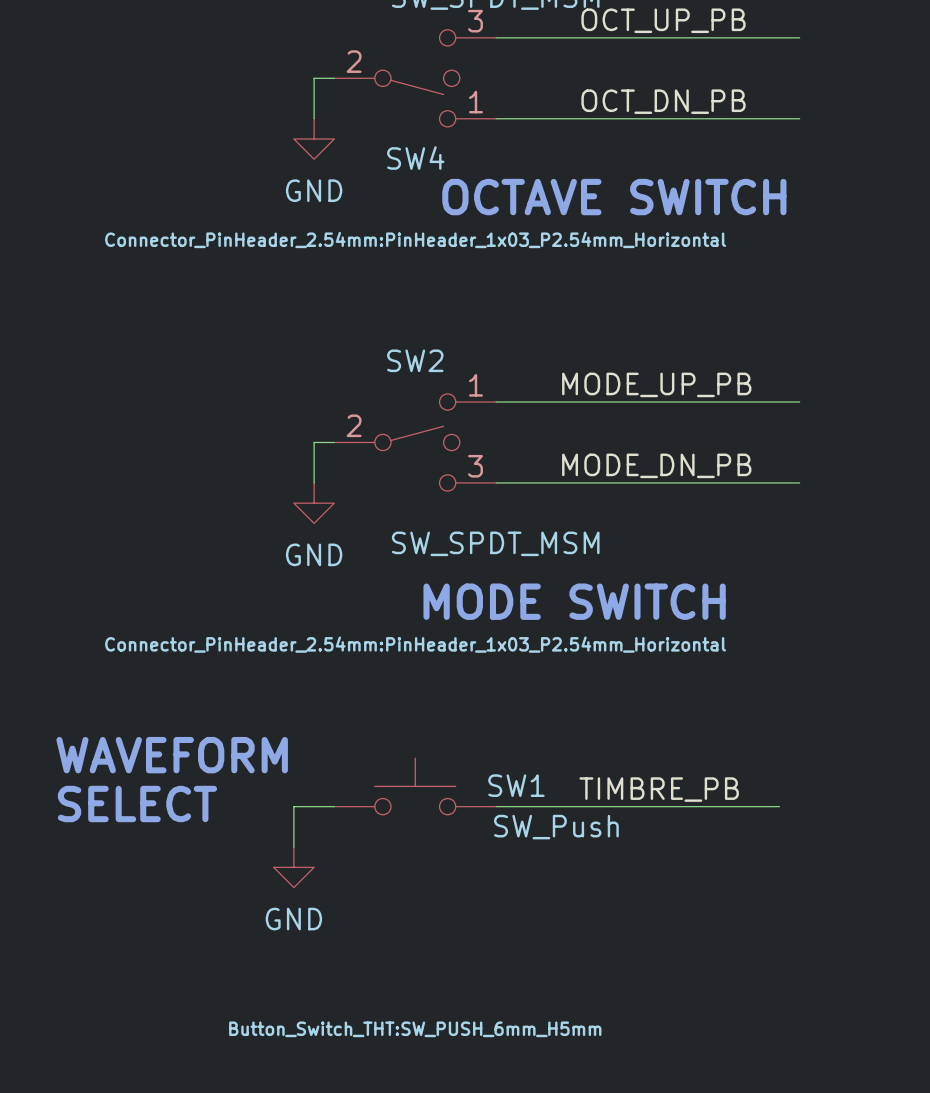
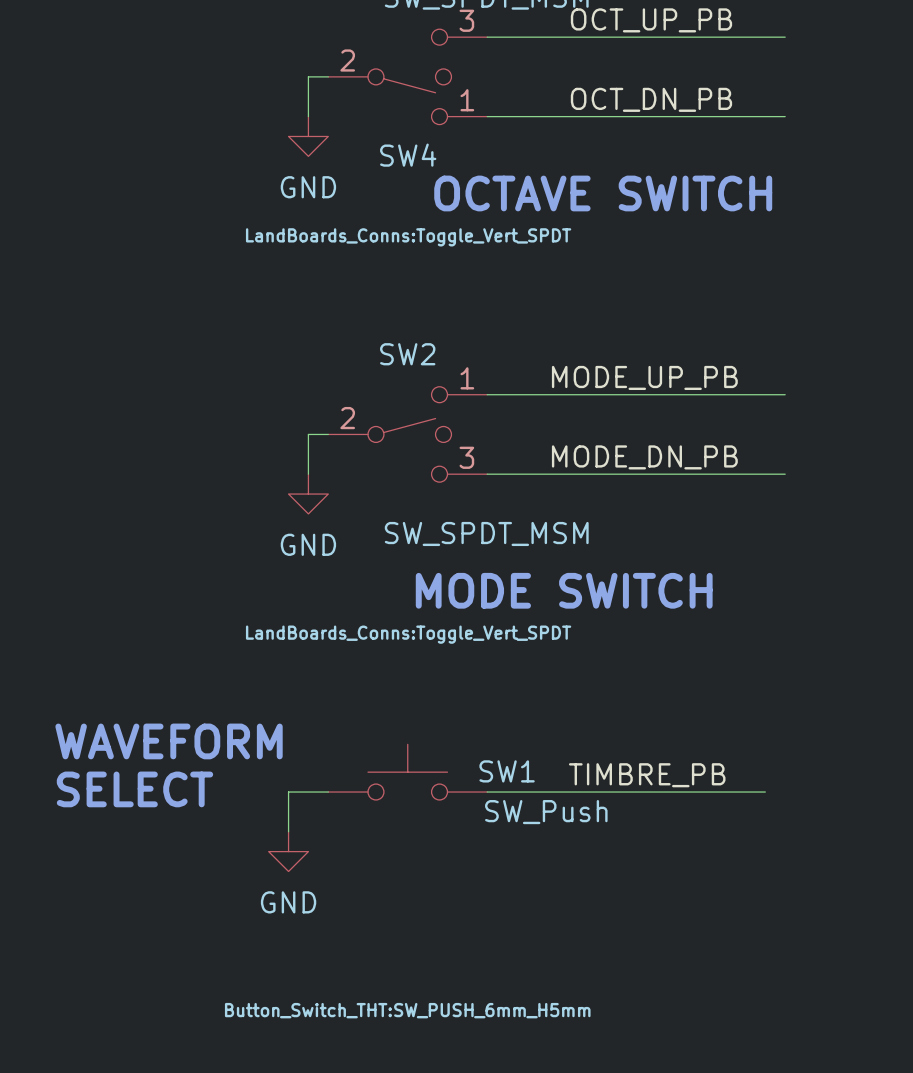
SW4 text: Connector_PinHeader_2.54mm:PinHeader_1x03_P2.54mm_Horizontal (415, 240) -> LandBoards_Conns:Toggle_Vert_SPDT (408, 237)
SW2 text: Connector_PinHeader_2.54mm:PinHeader_1x03_P2.54mm_Horizontal (415, 644) -> LandBoards_Conns:Toggle_Vert_SPDT (408, 634)

